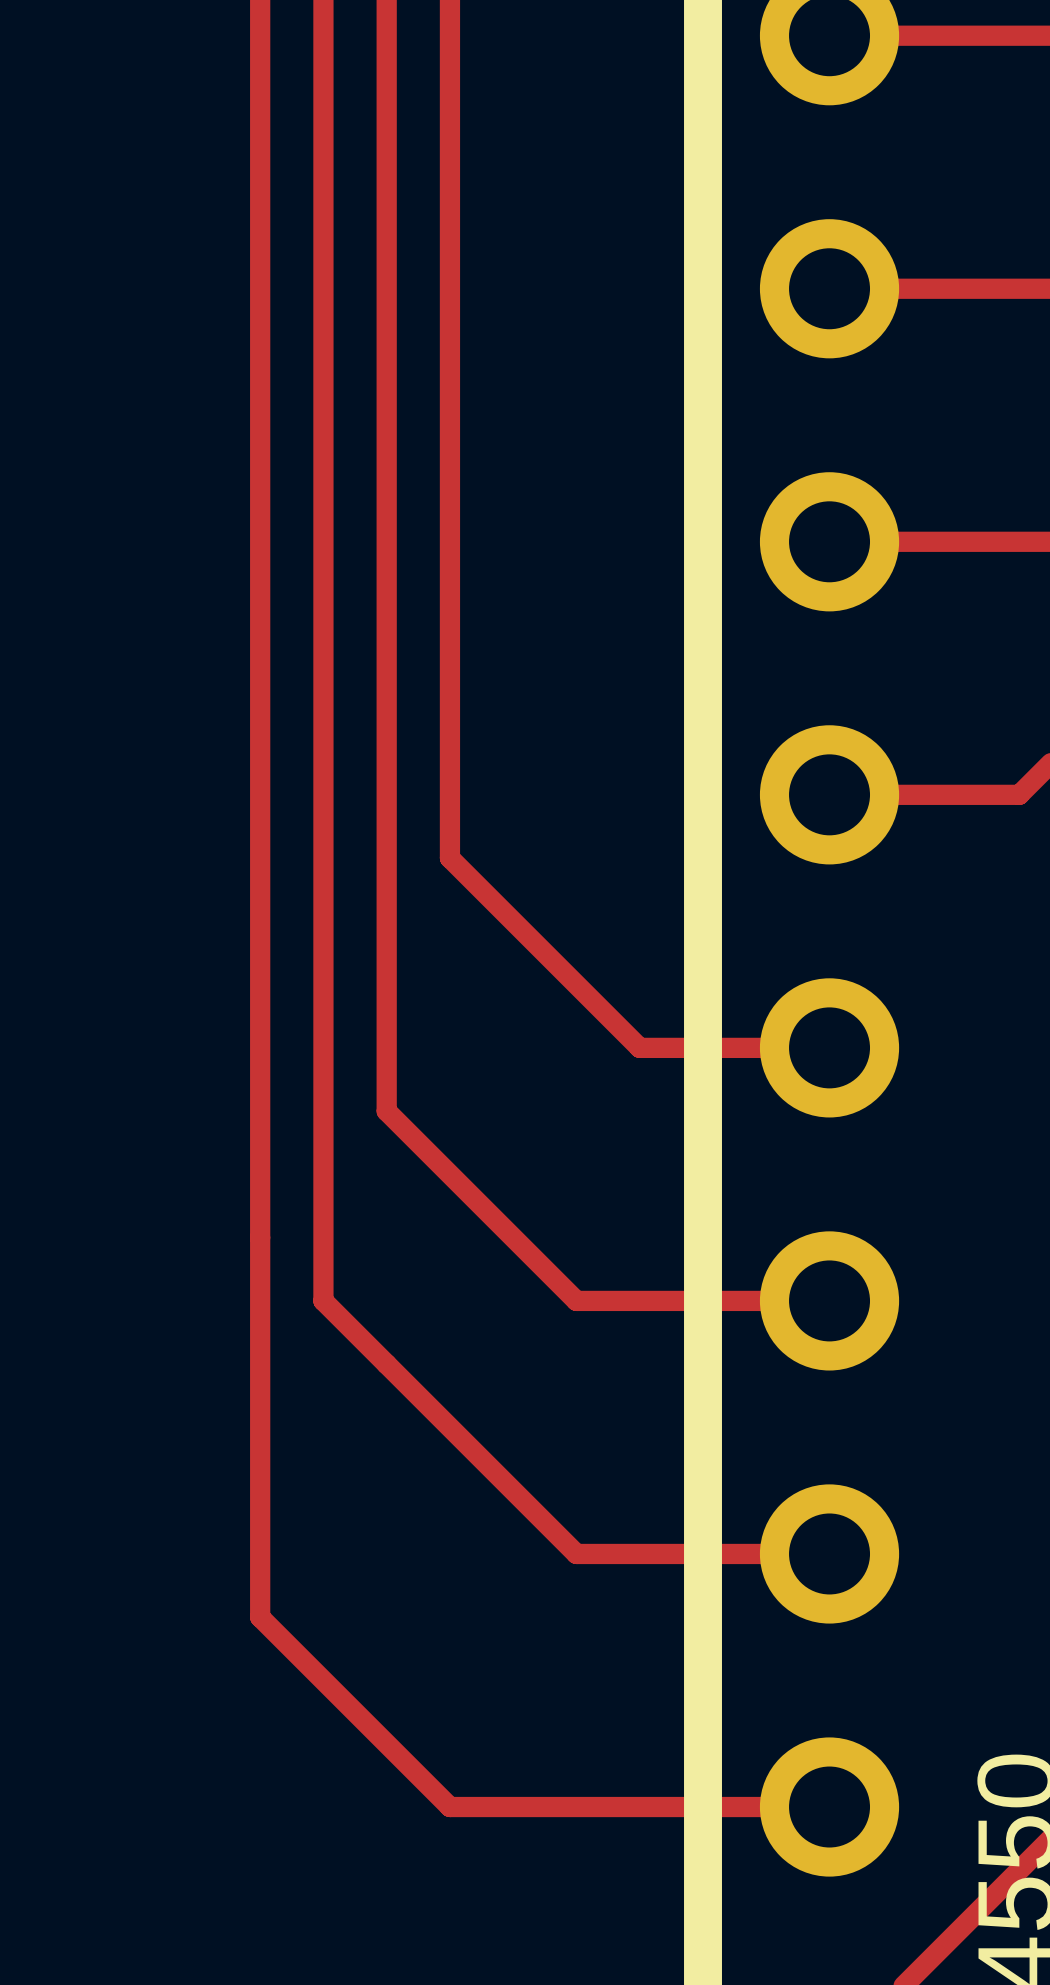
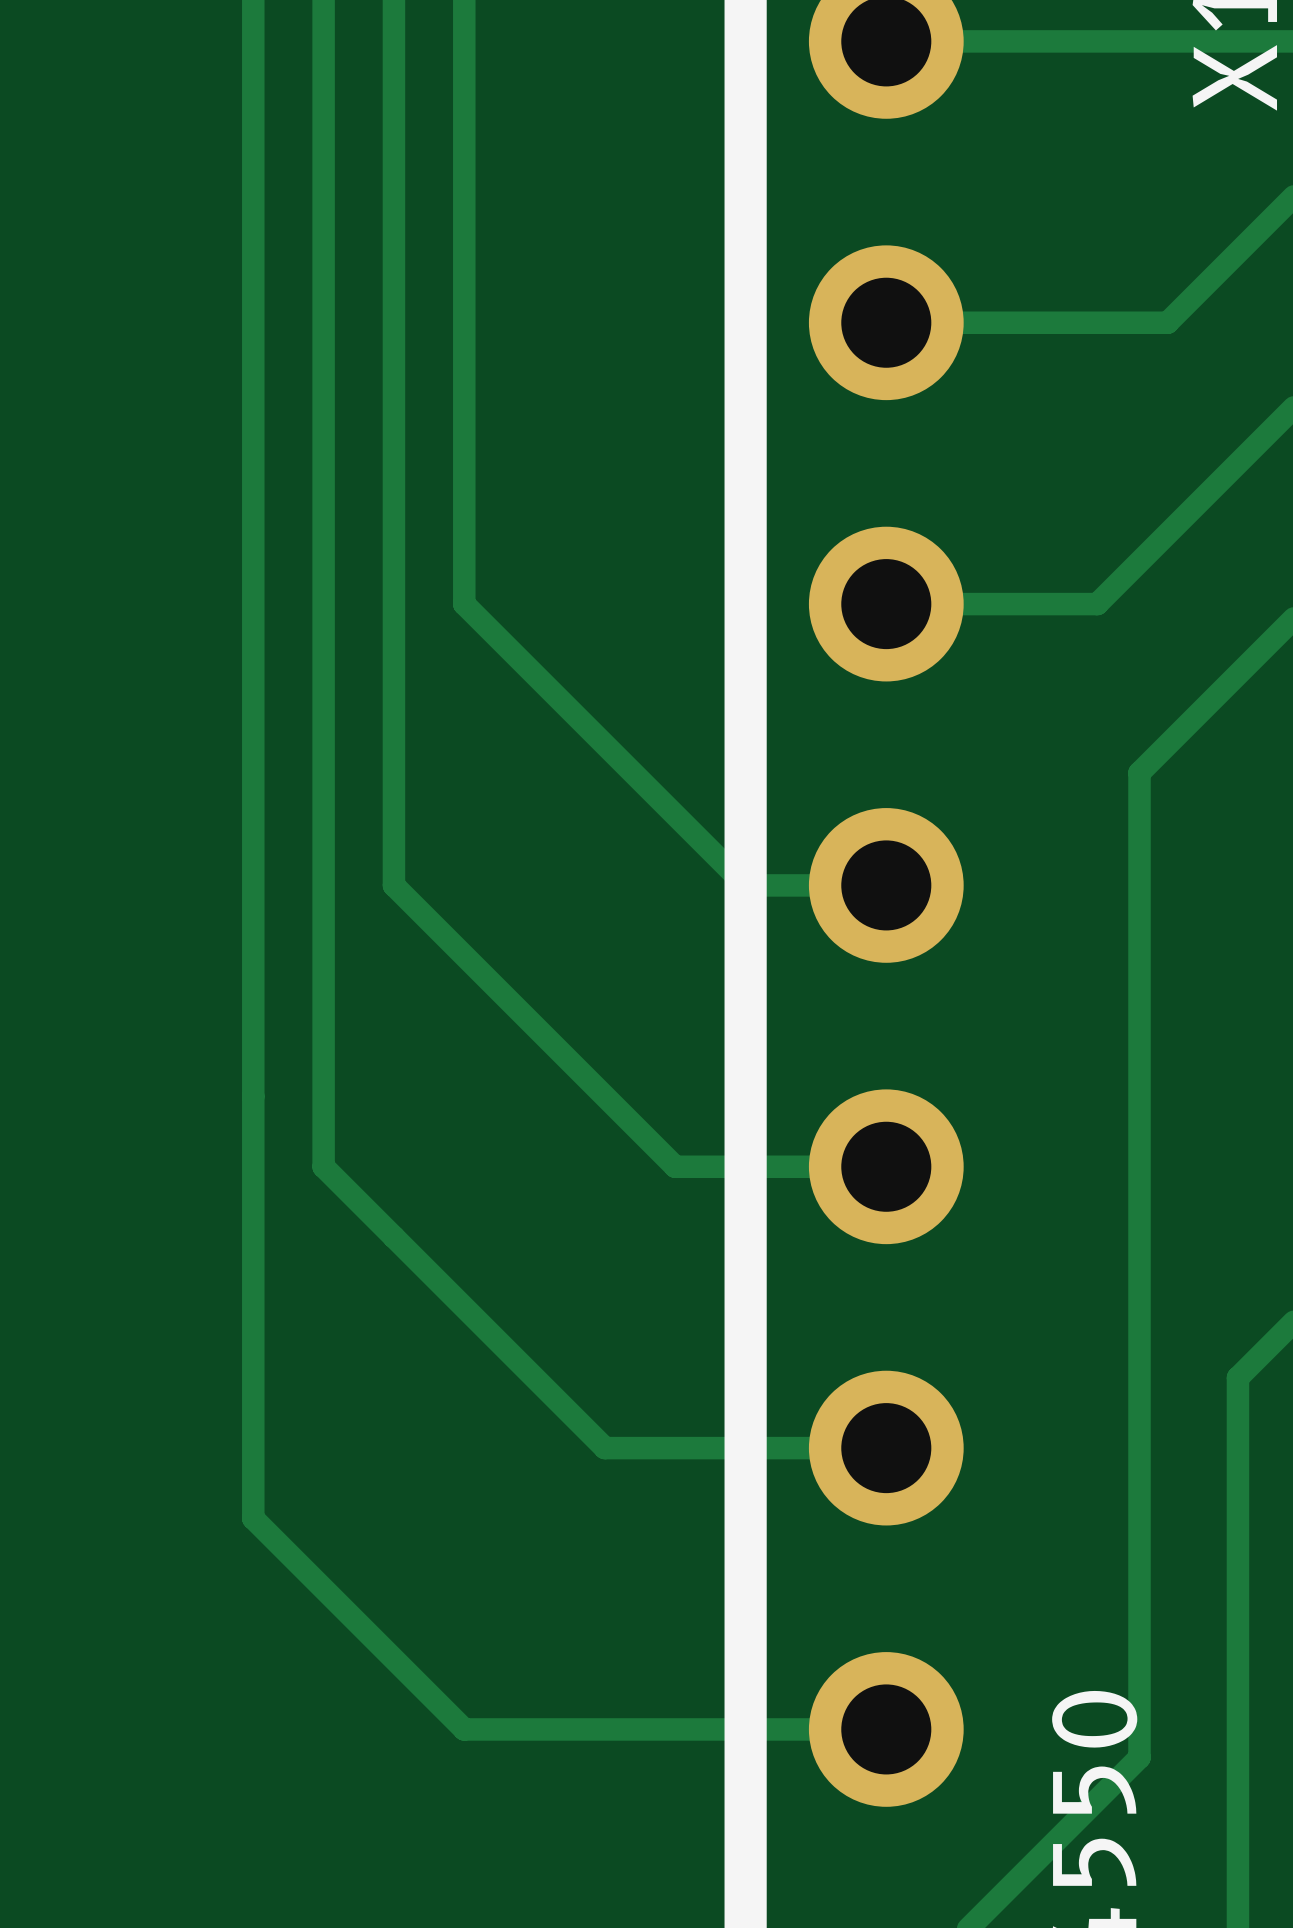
track: (449, 794) (449, 858) (639, 1047) (703, 1047) -> (464, 604) (745, 885)
track: (386, 1047) (386, 1111) (576, 1300) (639, 1300) -> (393, 885) (675, 1166)

